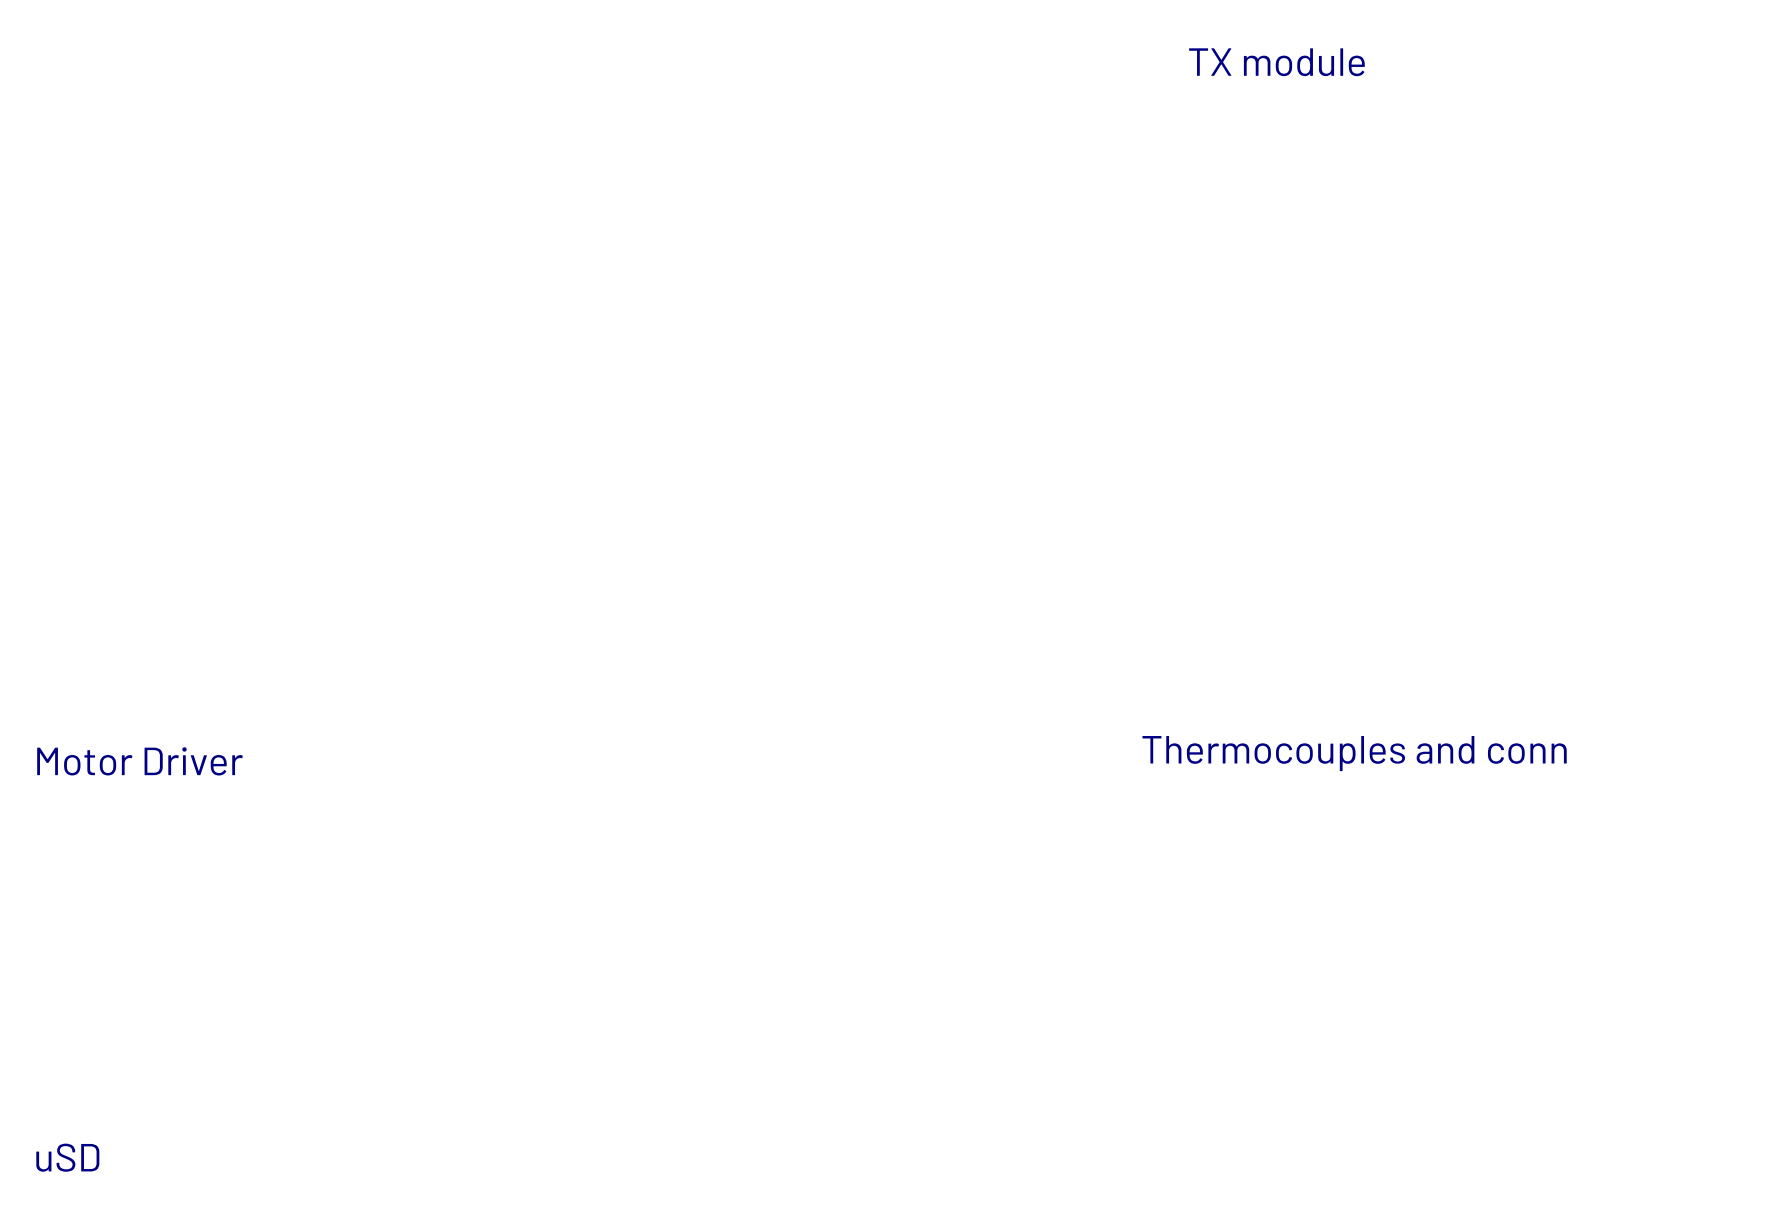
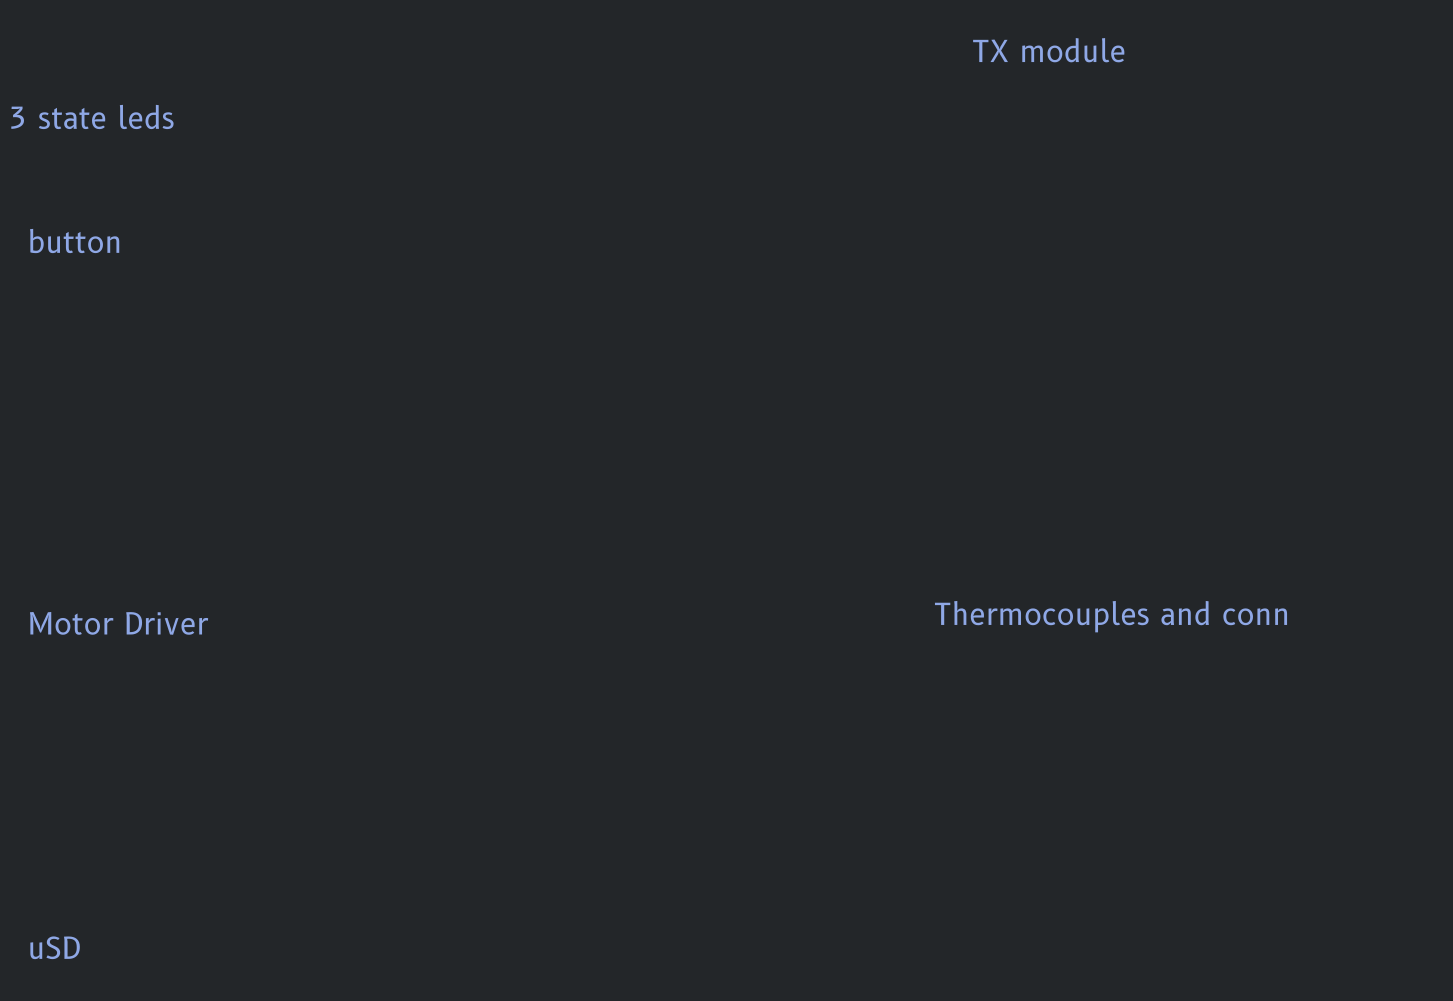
text: none -> 3 state leds (92, 116)
text: none -> button (74, 241)

